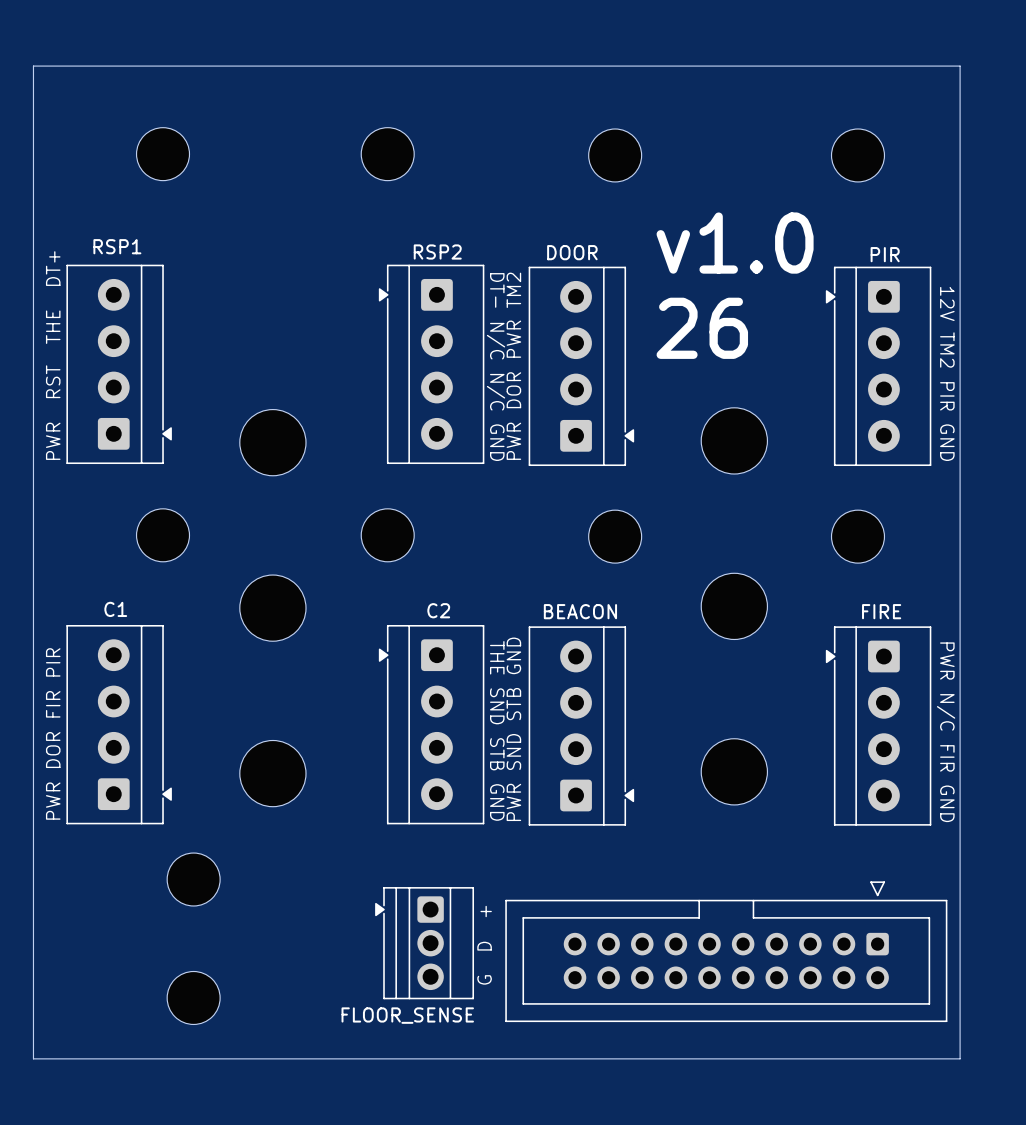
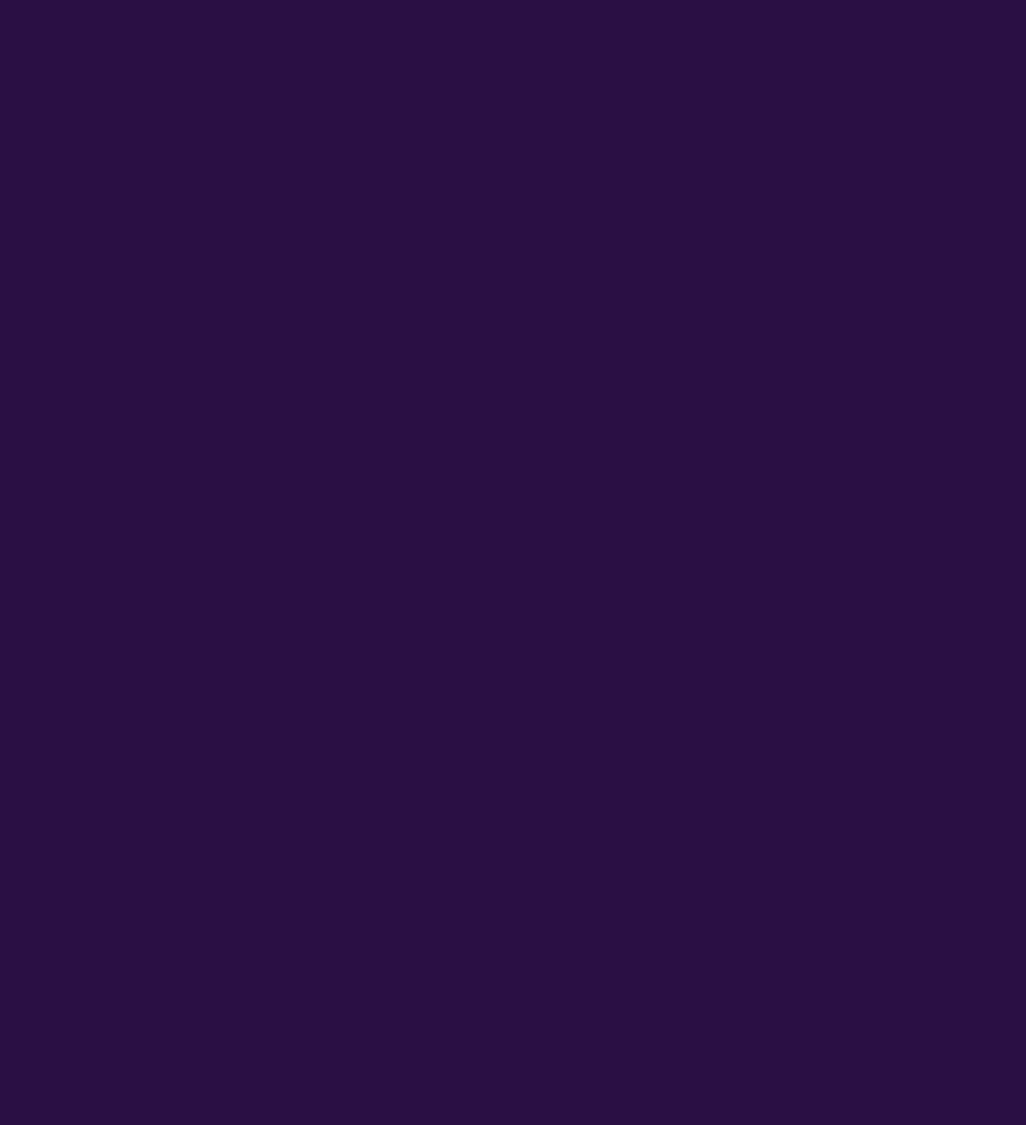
board edge: (33, 66) (960, 66) (960, 1058) (33, 1058) (33, 66) -> none
part: (163, 154) -> none
part: (387, 154) -> none
part: (615, 155) -> none
part: (857, 155) -> none
text: v1.0 (735, 243) -> none
text: 26 (702, 328) -> none
text: PWR RST THE DT+ (53, 355) -> none
part: RSP1 (119, 364) -> none
part: RSP2 (431, 364) -> none
text: PWR DOR PWR TM2 (513, 366) -> none
part: DOOR (581, 366) -> none
part: PIR (878, 366) -> none
text: DT- N/C N/C GND (496, 367) -> none
text: 12V TM2 PIR GND (947, 373) -> none
part: (734, 440) -> none
part: (272, 442) -> none
part: (163, 535) -> none
part: (387, 535) -> none
part: (615, 536) -> none
part: (857, 536) -> none
part: (734, 606) -> none
part: (272, 608) -> none
part: C1 (119, 724) -> none
part: C2 (431, 724) -> none
part: BEACON (581, 726) -> none
part: FIRE (878, 726) -> none
text: PWR SND STB GND (513, 729) -> none
text: THE SND STB GND (497, 730) -> none
text: PWR N/C FIR GND (946, 732) -> none
text: PWR DOR FIR PIR (53, 733) -> none
part: (734, 771) -> none
part: (272, 773) -> none
part: (193, 879) -> none
part: FLOOR_SENSE (424, 943) -> none
text: G D + (484, 945) -> none
part: (726, 951) -> none
part: (193, 997) -> none

